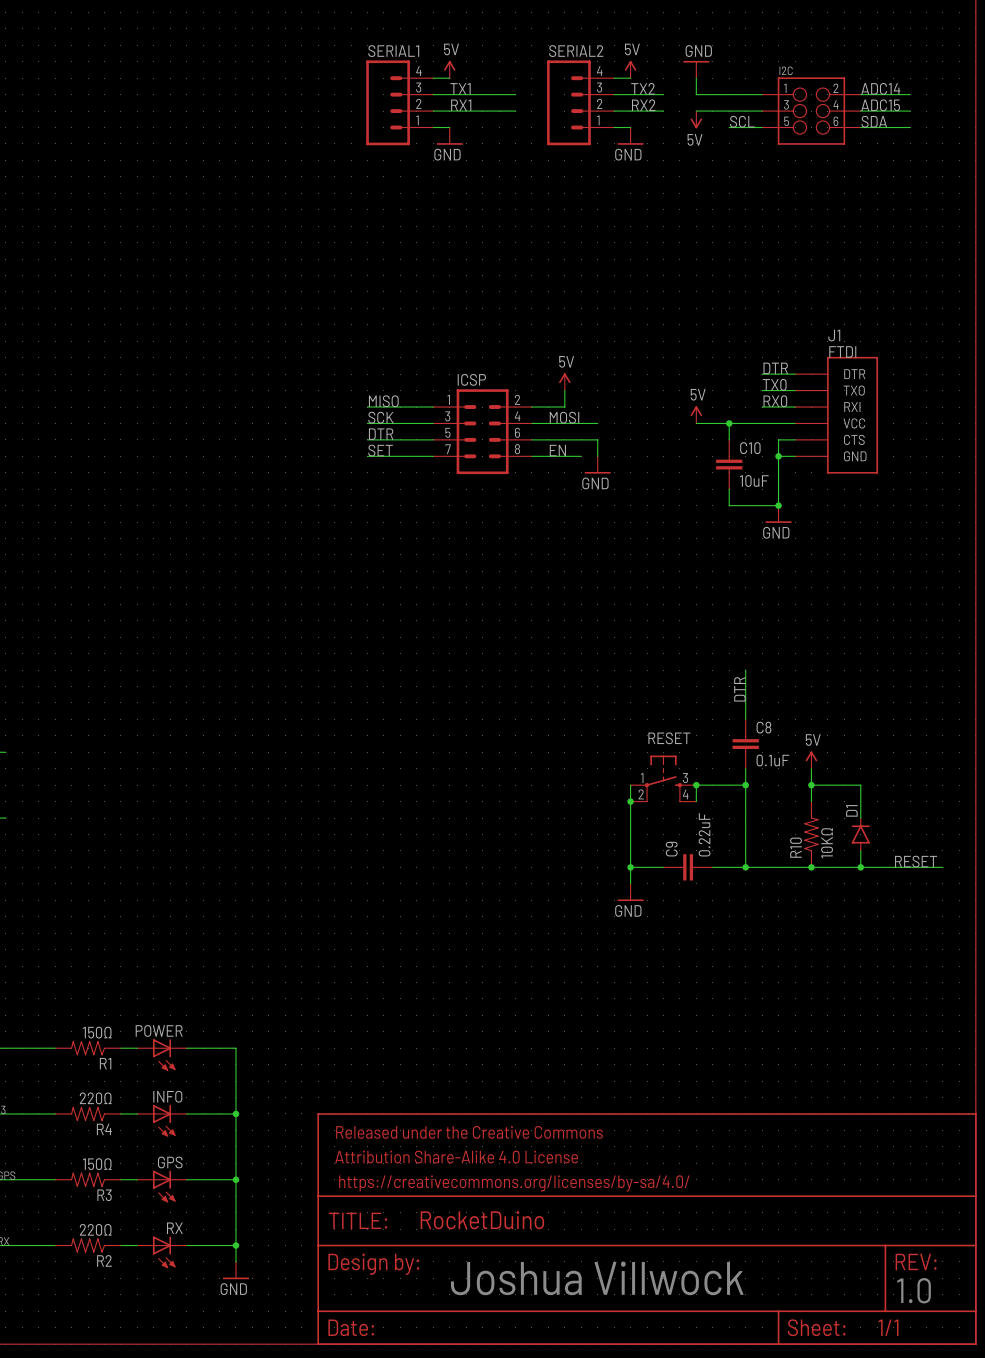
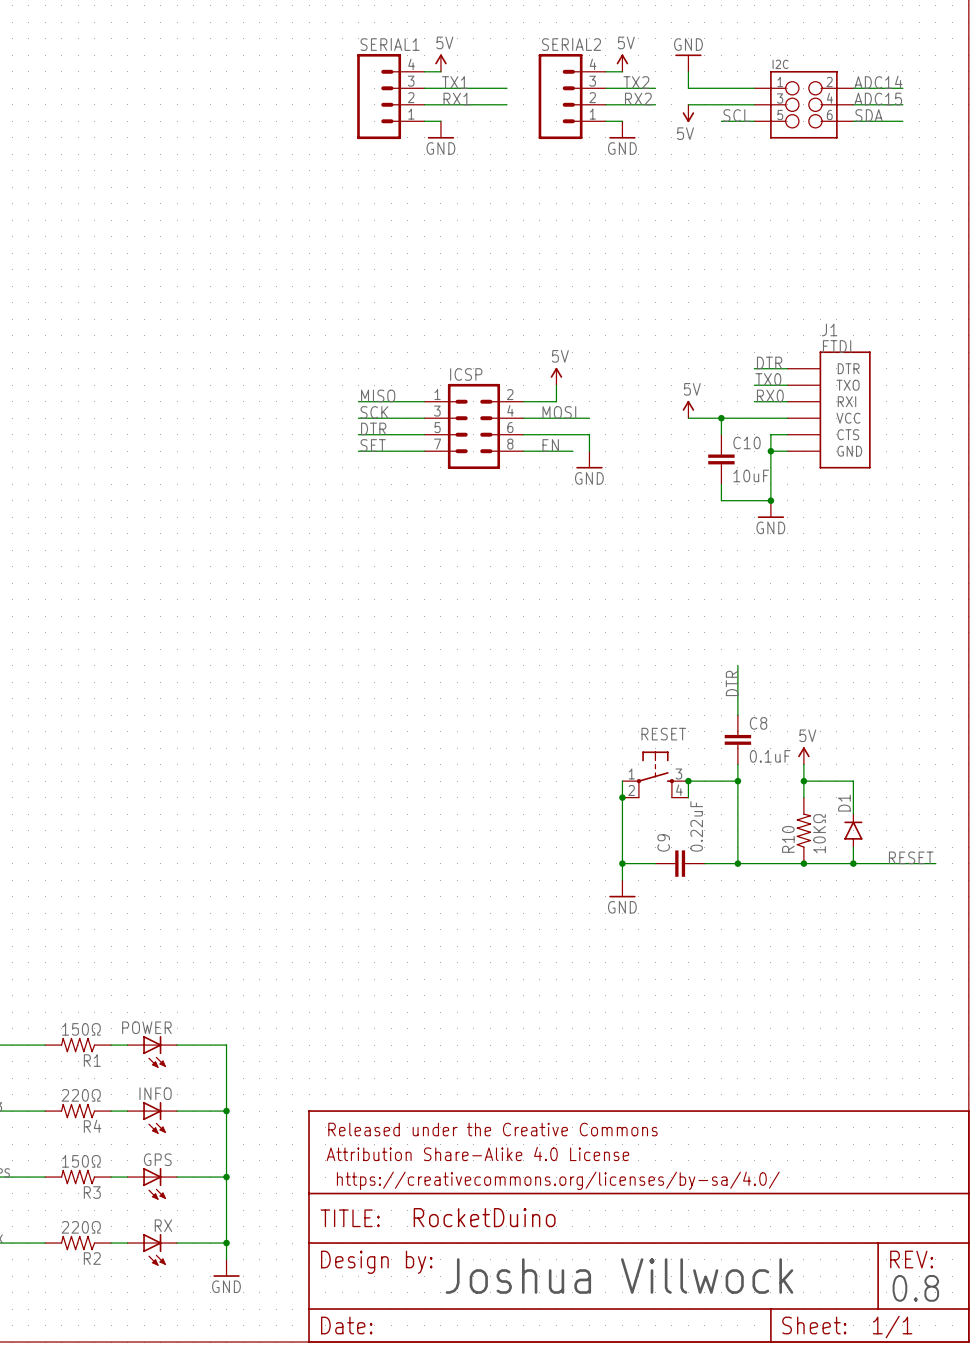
text: 1.0 (914, 1290) -> 0.8 (915, 1288)

